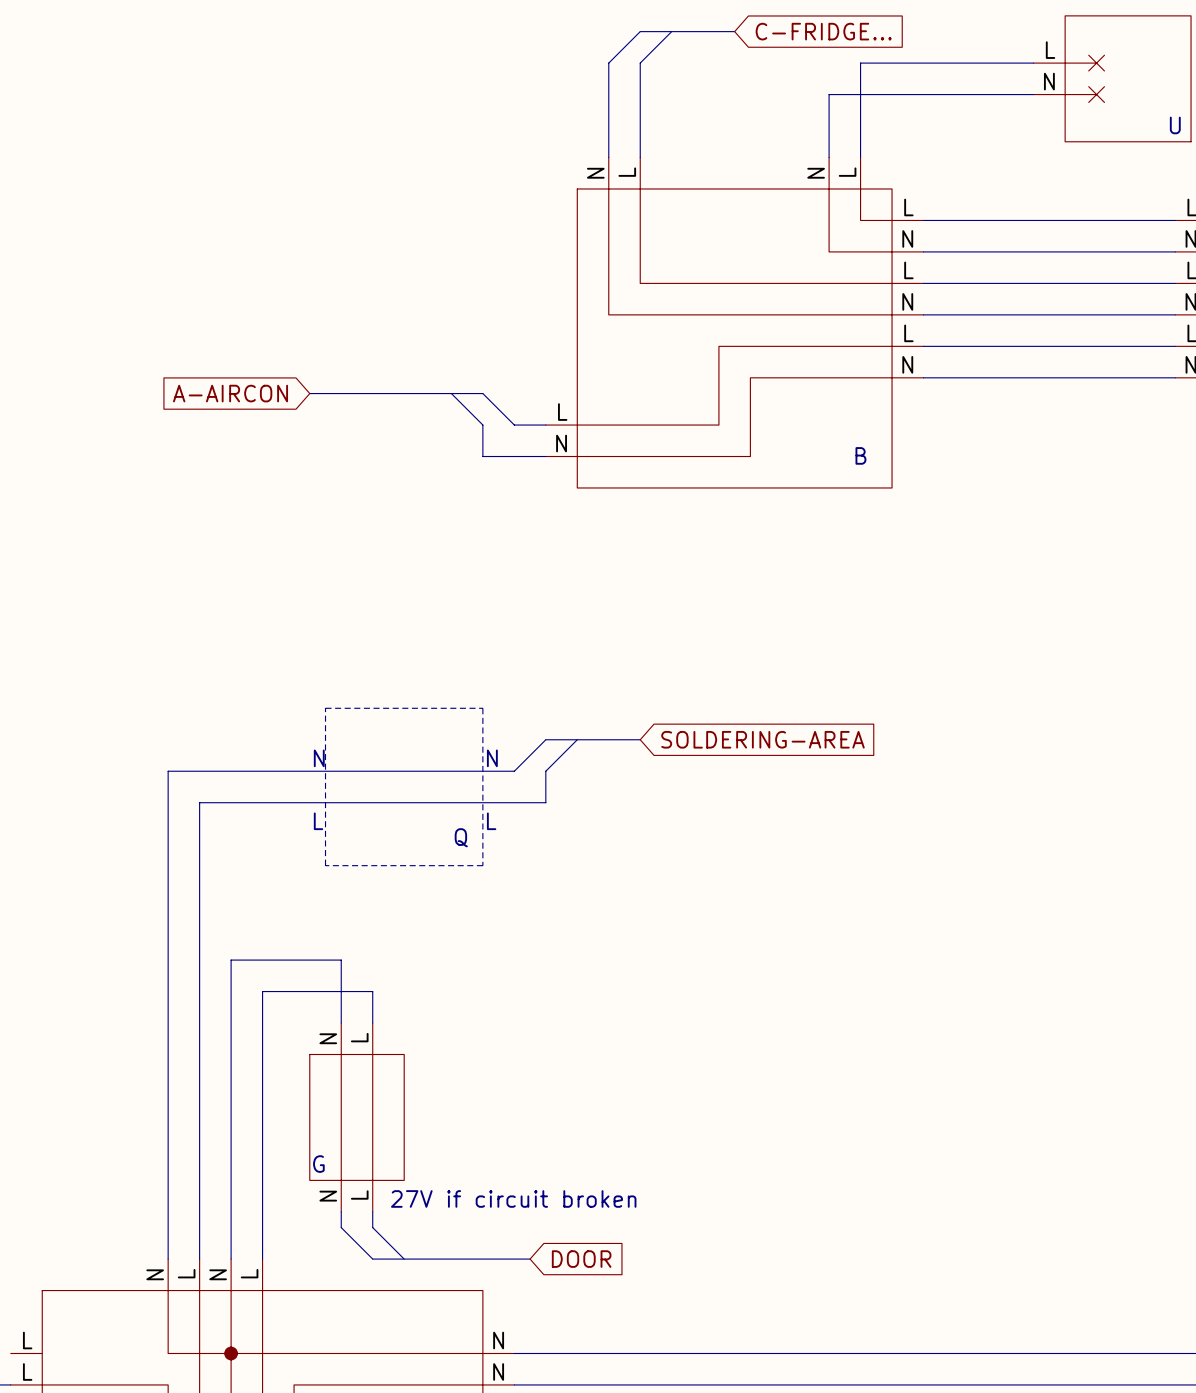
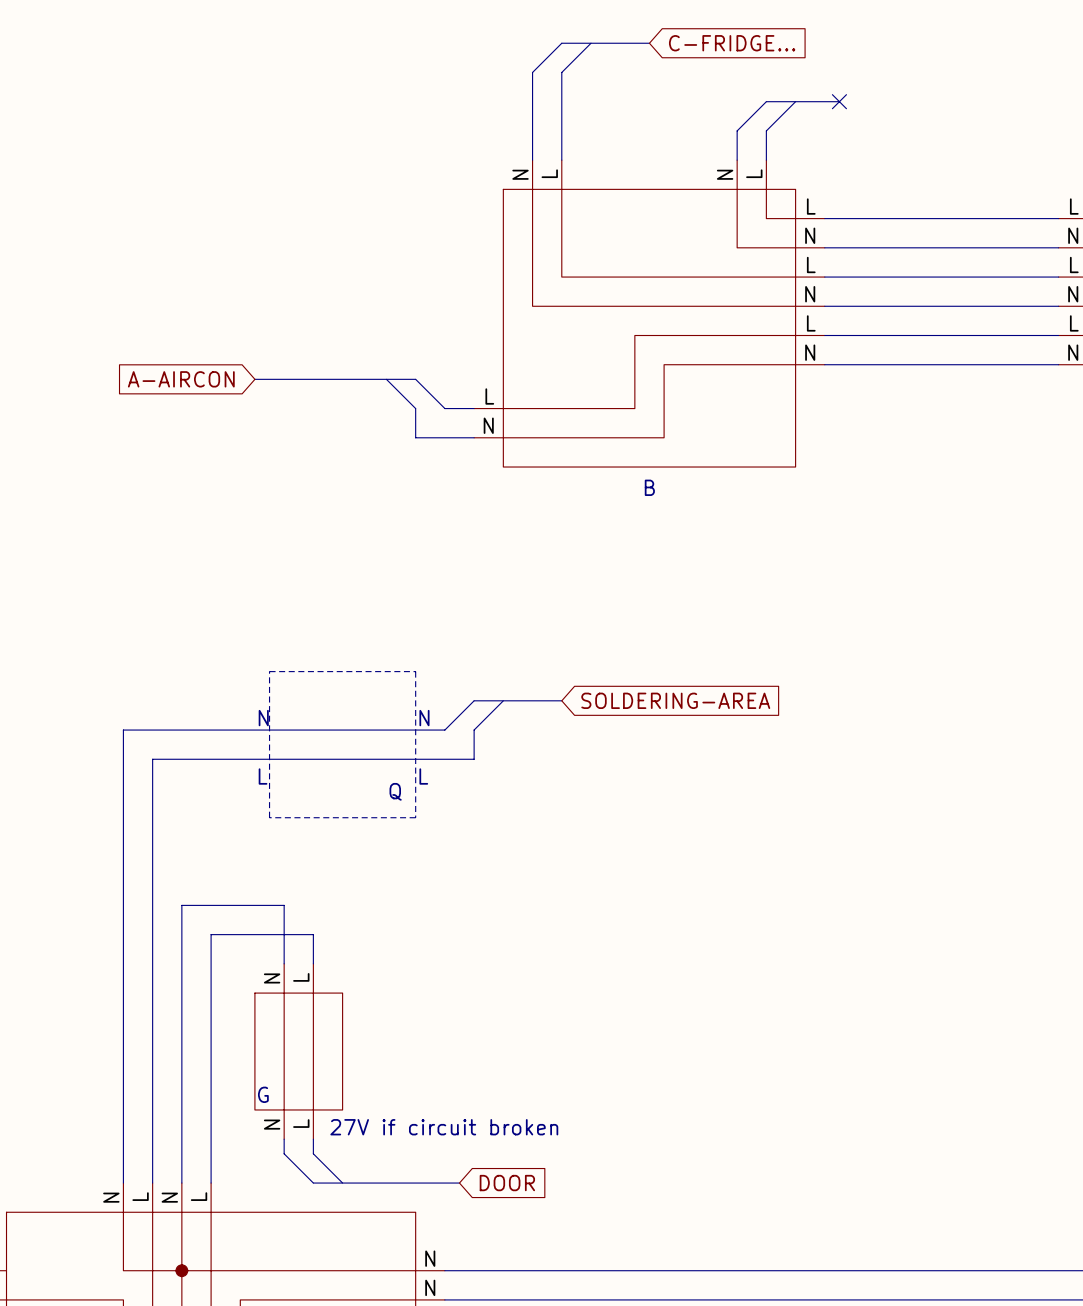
wire: (1033, 63) (860, 63) (860, 126) -> (795, 101) (766, 130)
part: U (1112, 78) -> none
bus: none -> (766, 101) (839, 101)
no-connect mark: none -> (839, 101)
wire: (1033, 94) (829, 94) (829, 126) -> (766, 101) (737, 130)
part value position: B (860, 455) -> B (649, 487)

